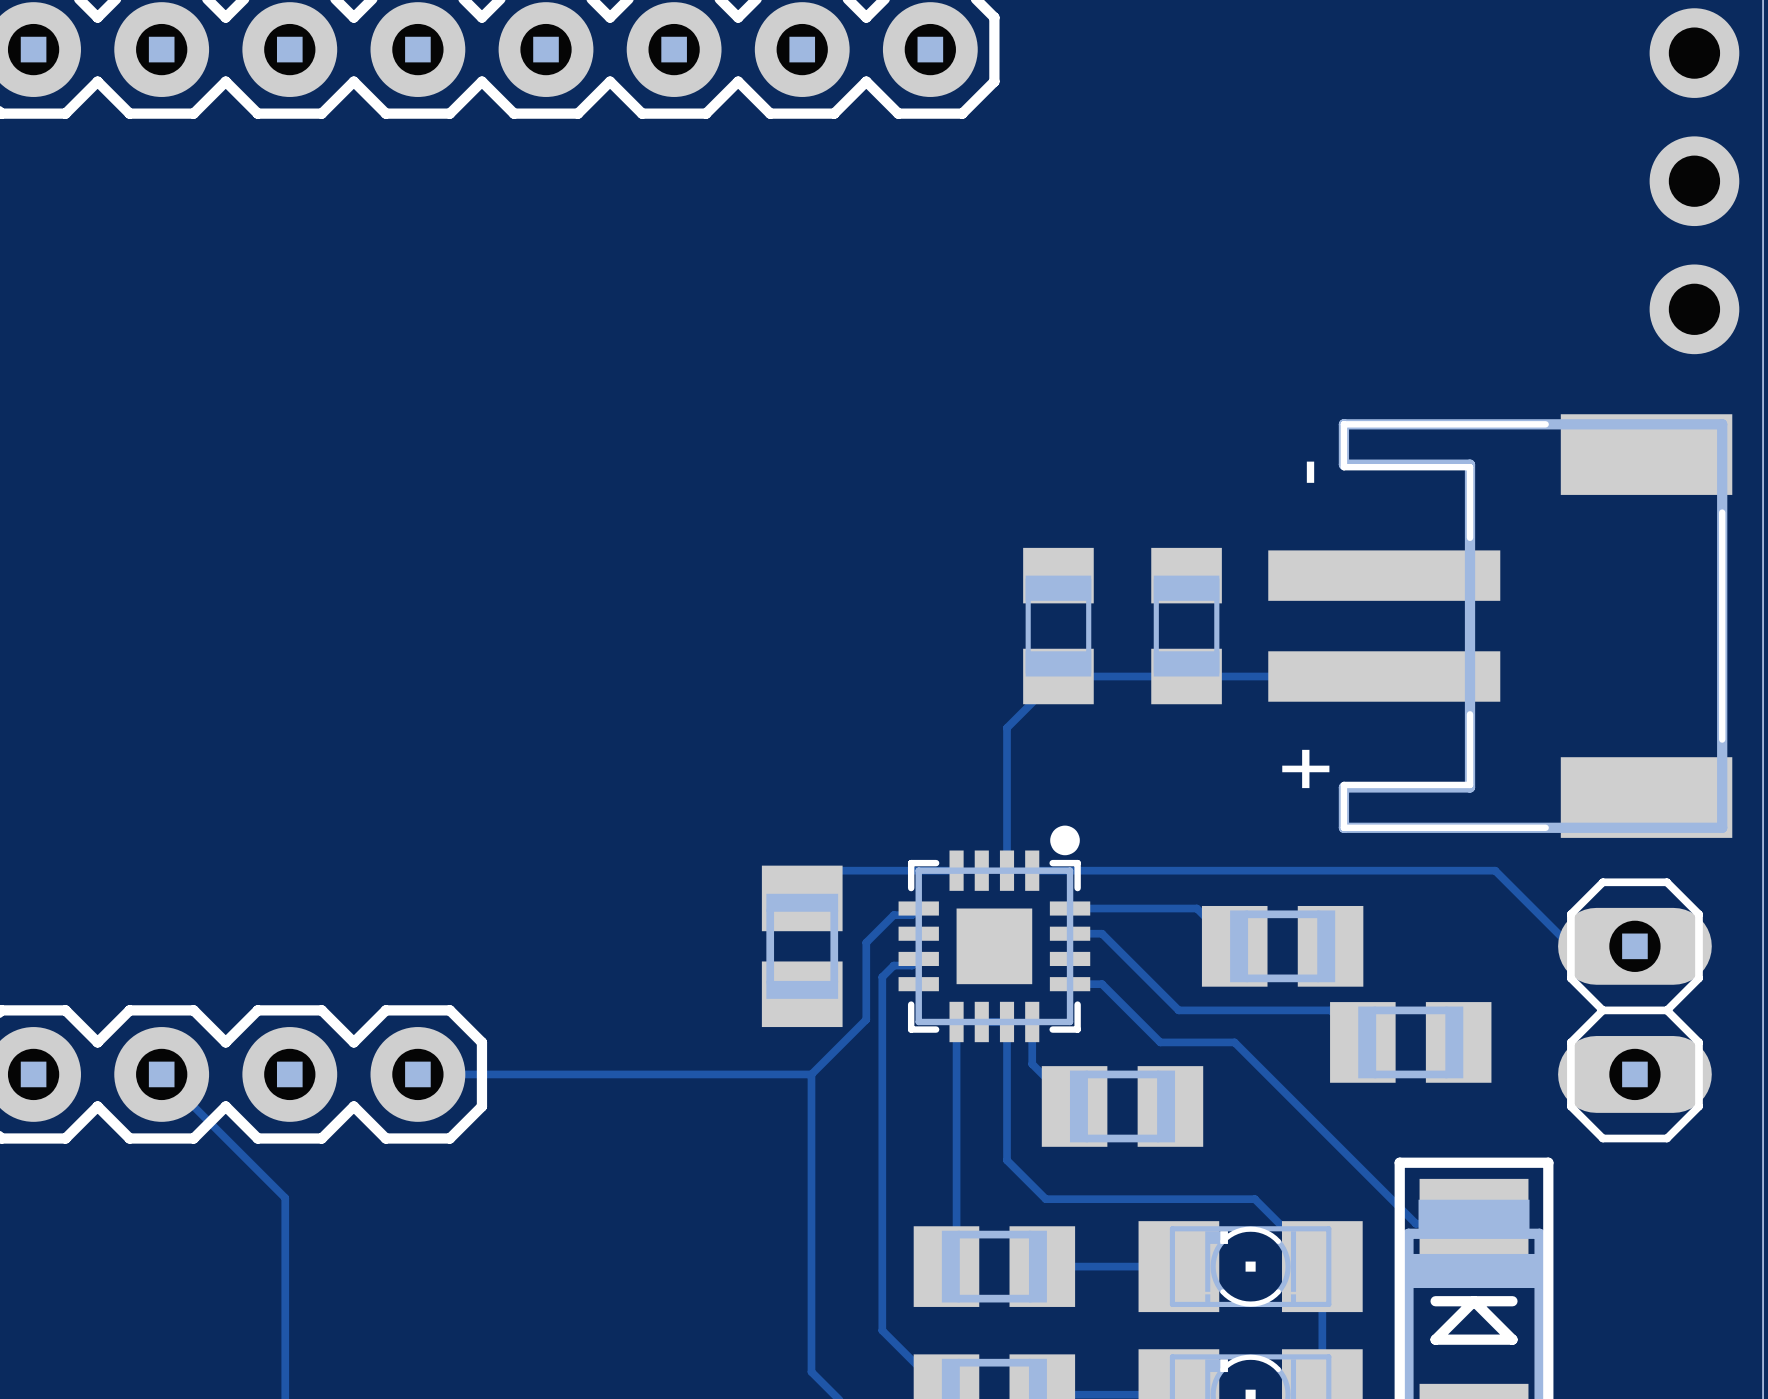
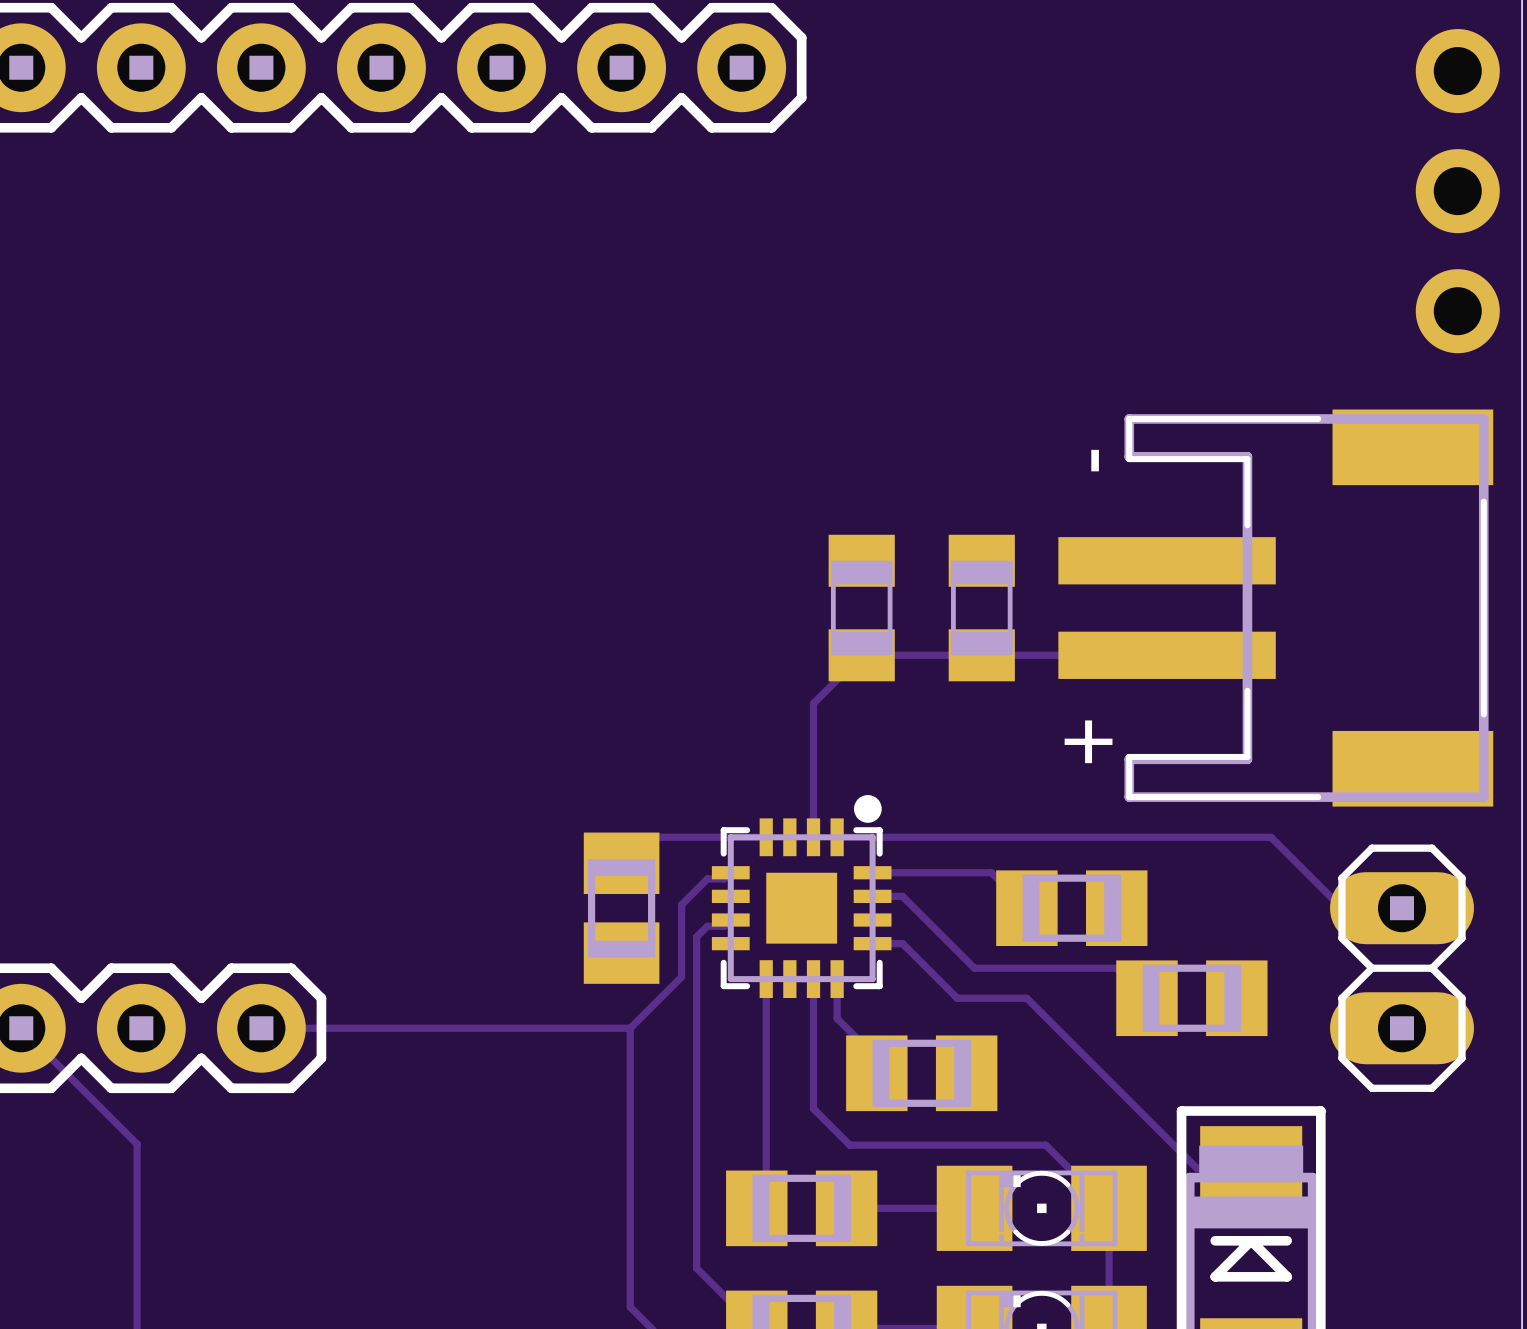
part position: (1122, 1106) -> (921, 1073)

